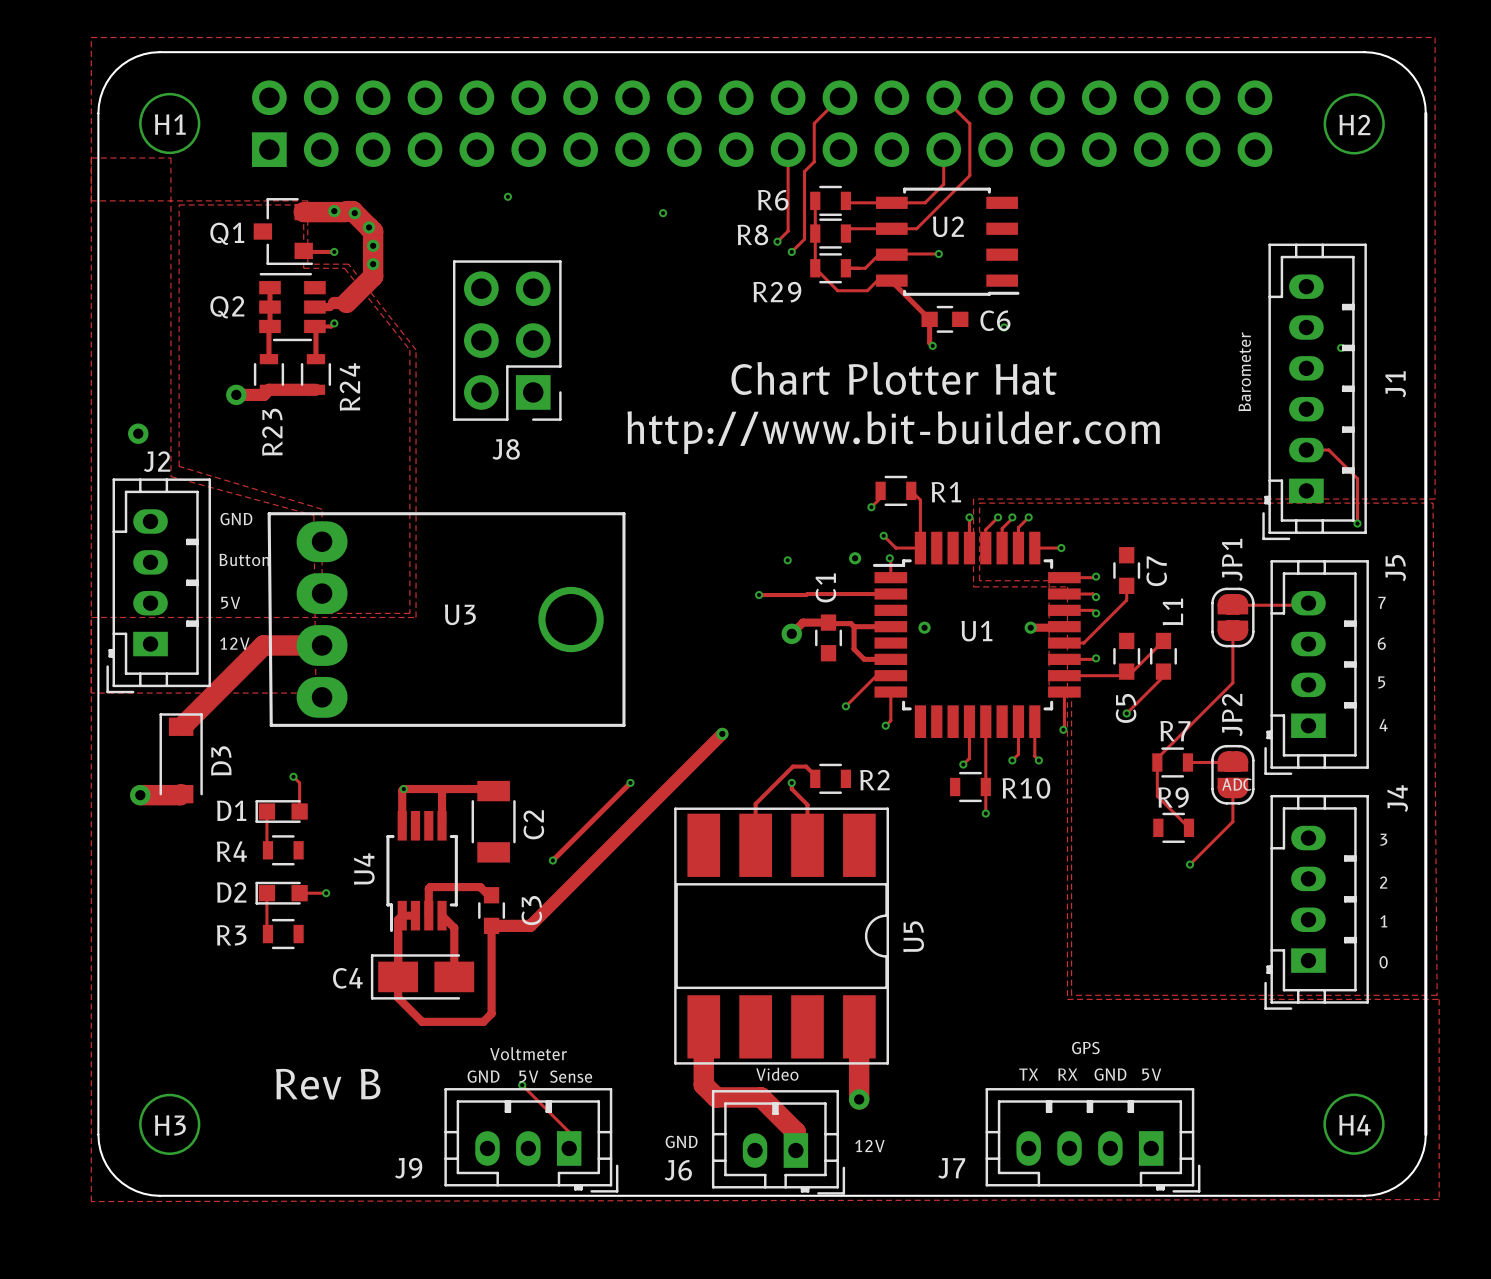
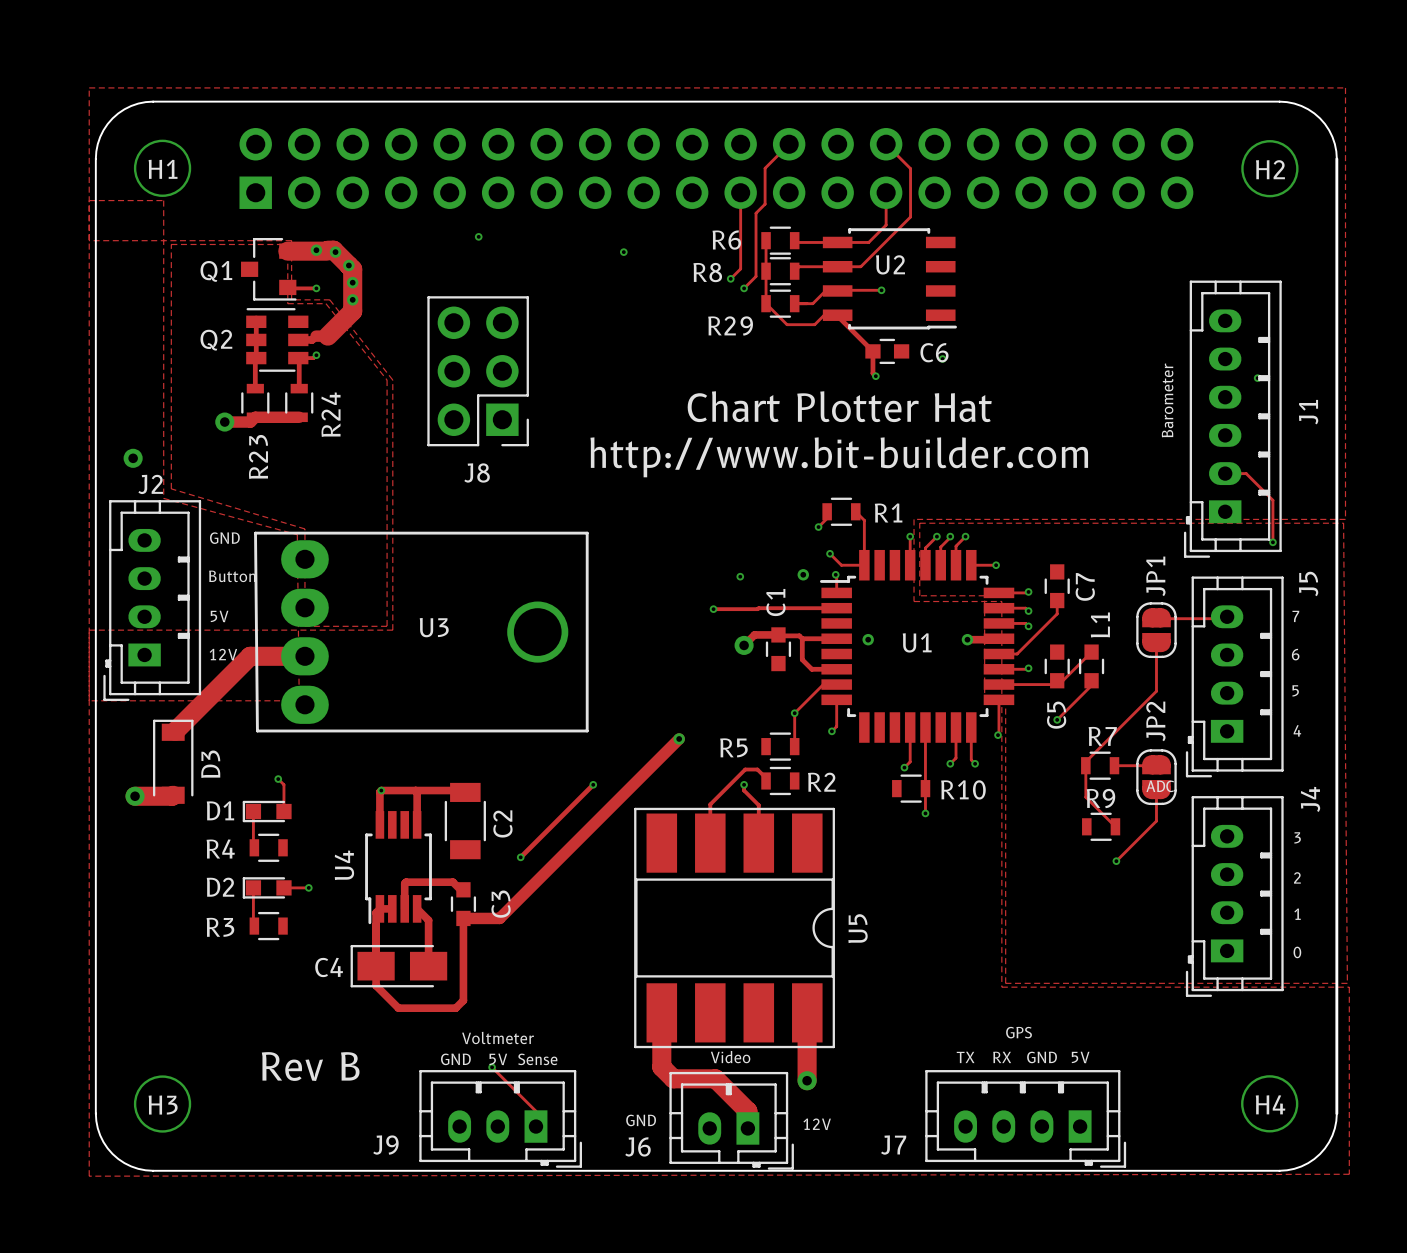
track: none -> (794, 713) (794, 746)
R5: none -> (780, 746)

